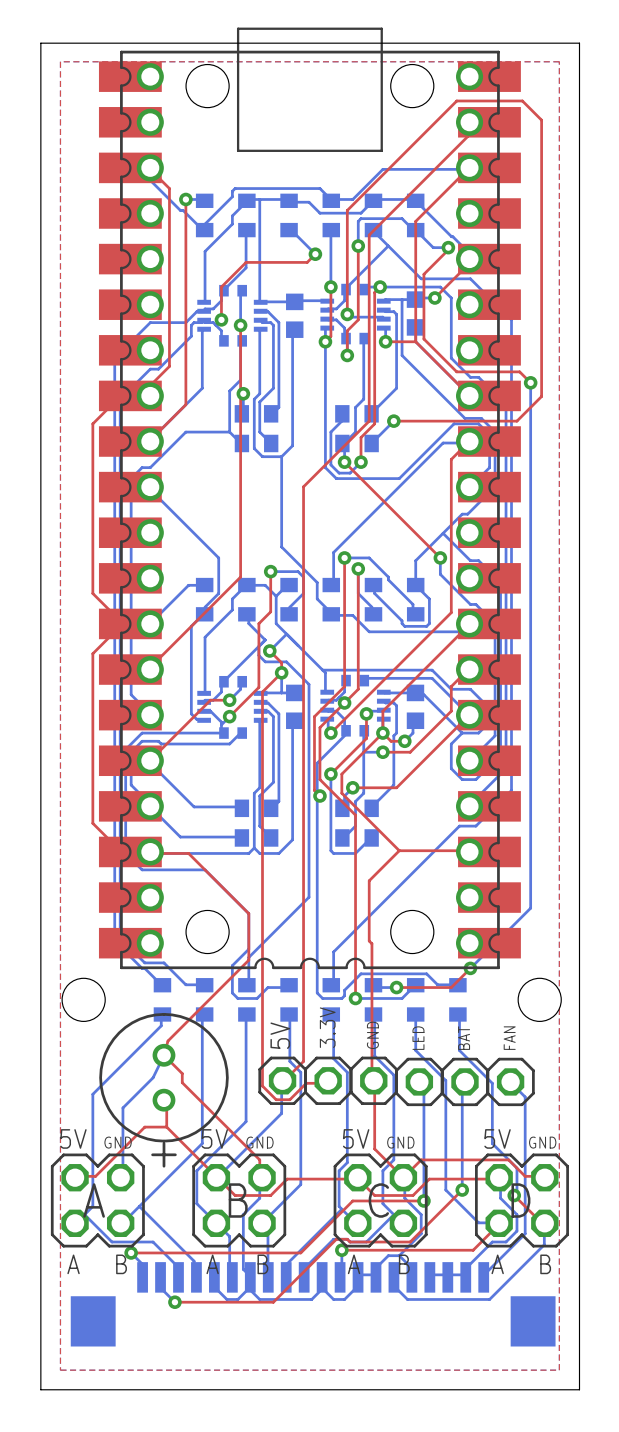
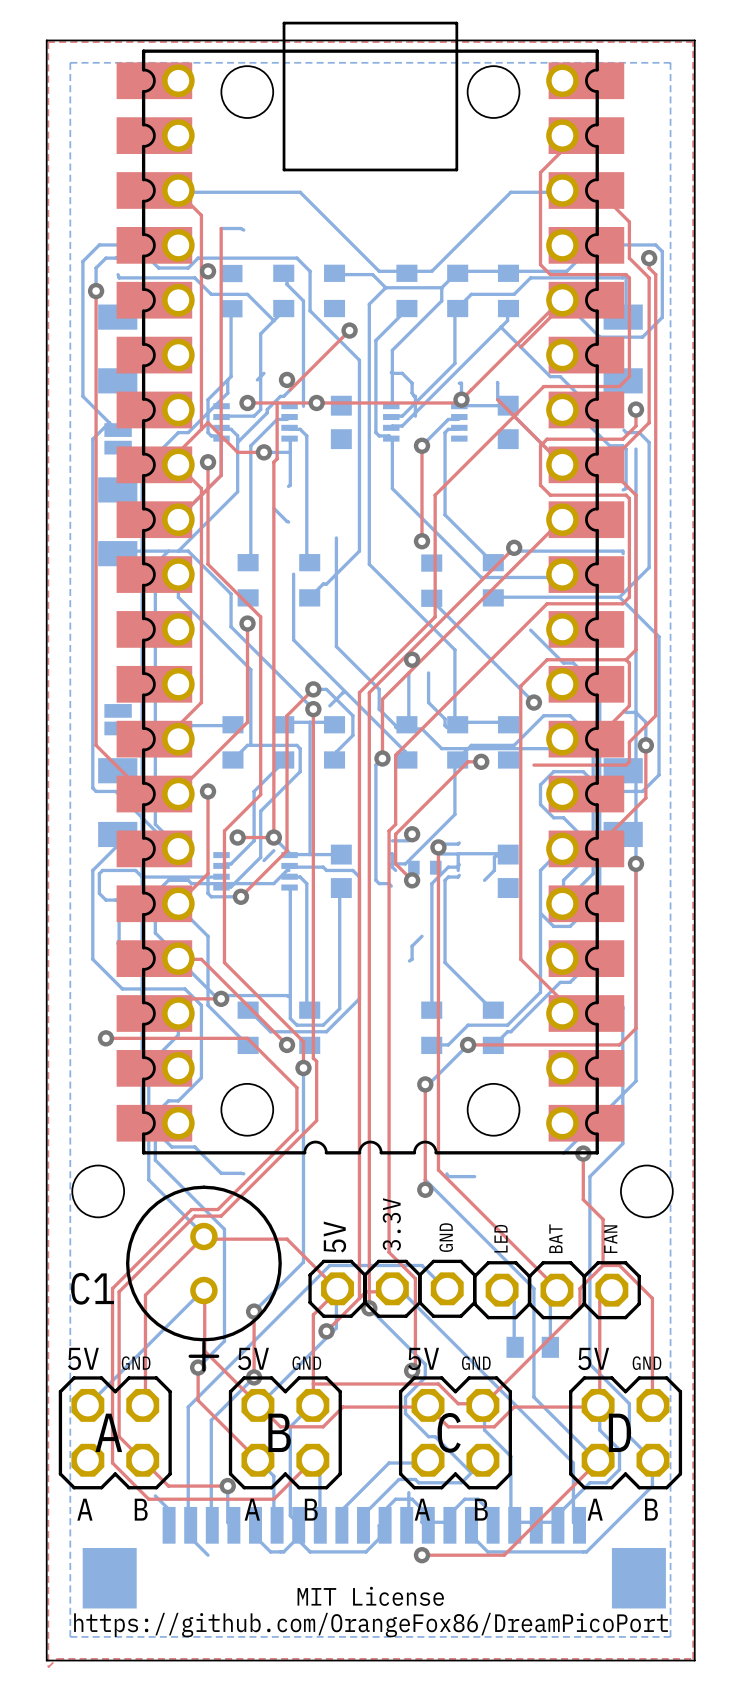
top zone outline: (60, 61) (559, 61) (559, 1370) (60, 1370) (60, 61) -> (48, 42) (48, 1667) (57, 1658) (693, 1658) (693, 42) (48, 42)
top track: (451, 152) (369, 235) (369, 421) (303, 486) (303, 1061) (282, 1080) -> (540, 172) (540, 264) (550, 274) (626, 274) (629, 277) (629, 376) (619, 386) (543, 386) (435, 495) (435, 616) (359, 692) (359, 1298)
top track: (469, 167) (415, 221) (415, 341) (385, 341) -> none
bottom track: (150, 169) (150, 180) (180, 210) (183, 210) (204, 230) (205, 224) (232, 196) (232, 191) (235, 188) (319, 188) (331, 200) (352, 199) (382, 169) (426, 169) -> (178, 192) (300, 192) (379, 271) (405, 271) (406, 273) (408, 271) (431, 271) (510, 192)
via position: (185, 199) -> (208, 271)
bottom track: (259, 199) (259, 235) -> (118, 430) (82, 396) (82, 261) (99, 244) (135, 244) (158, 268) (188, 268) (198, 258) (296, 258) (310, 271)
part: (204, 215) -> none
part: (246, 215) -> none
part: (289, 215) -> none
part: (331, 215) -> none
part: (373, 215) -> none
part: (415, 215) -> none
bottom track: none -> (118, 257) (105, 258) (96, 268) (96, 291)
top track: (541, 224) (541, 120) (522, 100) (456, 100) (347, 210) (347, 314) -> none
via: none -> (649, 258)
bottom track: (246, 230) (246, 267) (221, 292) (221, 300) (213, 308) (196, 311) (185, 322) (150, 322) (114, 358) (114, 941) (162, 985) -> none
bottom track: (289, 230) (315, 254) -> none
bottom track: (331, 230) (330, 287) -> none
bottom track: (373, 230) (421, 278) (470, 278) (511, 319) (511, 790) (497, 804) -> none
top track: (541, 232) (541, 240) -> (586, 190) (586, 192) (599, 192) (629, 221) (629, 258) (649, 277)
top track: none -> (649, 268) (655, 274) (655, 715) (629, 742) (629, 761) (626, 765) (533, 765)
bottom track: none -> (283, 273) (287, 274) (287, 284) (303, 300) (303, 406)
bottom track: none -> (334, 273) (372, 274) (385, 287)
bottom track: none -> (118, 274) (119, 277) (194, 277) (211, 294) (247, 294) (273, 320)
top track: (358, 246) (358, 319) (347, 330) (347, 355) -> none
bottom track: (358, 246) (358, 221) (361, 218) (402, 218) (433, 247) (448, 247) -> none
via: (358, 246) -> none
bottom track: (388, 246) (344, 289) (344, 300) (336, 308) (327, 310) -> none
top track: (448, 247) (423, 274) (423, 339) (456, 371) (519, 371) (530, 382) -> none
via: (448, 247) -> none
bottom track: none -> (385, 287) (441, 287)
bottom track: none -> (385, 287) (369, 304) (369, 564) (454, 649) (454, 722) (457, 724) (458, 722) (507, 722) (508, 724)
bottom track: none -> (441, 287) (441, 300) (392, 350) (391, 406)
top track: none -> (96, 291) (96, 745) (142, 791) (152, 791) (154, 794)
via: none -> (96, 291)
part: none -> (231, 291)
part: none -> (283, 290)
part: none -> (334, 290)
part: none -> (406, 290)
part: none -> (457, 290)
part: none -> (508, 290)
top track: (315, 254) (307, 262) (246, 262) (221, 287) (221, 319) -> none
via: (315, 254) -> none
top track: none -> (562, 300) (586, 300) (560, 300) (458, 402) (247, 402)
bottom track: (469, 259) (469, 253) (412, 199) (374, 199) (361, 213) (319, 213) (309, 202) (289, 202) (287, 199) (248, 199) (232, 215) (232, 224) (205, 251) (204, 302) -> (562, 300) (599, 337) (642, 337) (662, 317) (662, 251) (655, 244) (593, 244) (566, 271) (510, 271) (508, 273) (507, 271) (458, 271) (441, 287)
bottom track: none -> (283, 308) (283, 310) (260, 333) (260, 409) (254, 416) (221, 417)
bottom track: none -> (508, 308) (507, 320) (402, 426) (392, 426) (391, 427)
bottom track: (259, 267) (260, 302) (327, 301) -> (310, 310) (359, 360) (359, 551) (309, 597)
bottom track: none -> (623, 317) (626, 314) (626, 277) (623, 274) (622, 277) (530, 277) (514, 294) (471, 294) (454, 310) (454, 363) (402, 416) (391, 417)
bottom track: none -> (501, 327) (550, 376) (560, 376) (586, 402) (586, 422) (609, 445) (622, 445) (626, 449) (626, 488) (623, 489)
top track: none -> (349, 330) (290, 389)
via: none -> (349, 330)
top track: (330, 287) (330, 336) (325, 341) -> none
via: (330, 287) -> none
top track: (380, 287) (374, 292) (374, 423) (361, 437) (361, 462) -> none
via: (380, 287) -> none
part: (355, 289) -> none
bottom track: (364, 289) (366, 287) (440, 287) (451, 297) (451, 358) (470, 377) (478, 377) (506, 404) (506, 768) (469, 806) -> none
part: (233, 290) -> none
bottom track: (242, 290) (240, 325) -> none
bottom track: (434, 297) (383, 301) -> none
via: (434, 297) -> none
part: none -> (117, 348)
bottom track: (402, 299) (402, 355) (464, 418) (481, 418) (495, 432) (495, 486) (467, 514) (462, 514) (415, 560) (415, 585) -> none
part: none -> (623, 348)
bottom track: (383, 310) (393, 311) (396, 314) (396, 388) (371, 413) -> none
bottom track: (260, 311) (267, 311) (278, 322) (278, 407) (271, 413) -> none
part position: (415, 313) -> (508, 422)
bottom track: (347, 314) (350, 317) (382, 317) (383, 319) -> none
via: (347, 314) -> none
part position: (355, 314) -> (425, 422)
part position: (232, 315) -> (255, 422)
part position: (294, 315) -> (341, 422)
via: (221, 319) -> none
bottom track: (260, 320) (262, 322) (270, 322) (273, 325) (273, 388) (259, 401) (259, 432) (271, 443) -> none
bottom track: (194, 322) (202, 322) (204, 320) (205, 322) (213, 322) (221, 330) (221, 339) (223, 340) -> (231, 376) (231, 308)
top track: (240, 325) (240, 577) (207, 609) -> (247, 623) (247, 722)
bottom track: (327, 328) (325, 328) (325, 467) (336, 478) (399, 478) (454, 423) (478, 423) (489, 434) (489, 467) (469, 487) -> (406, 308) (375, 340) (375, 432) (379, 435) (389, 435) (392, 439) (392, 488) (481, 577) (560, 577) (562, 574)
bottom track: (204, 329) (202, 330) (202, 388) (185, 404) -> (227, 379) (208, 399) (208, 432) (211, 435) (221, 435) (221, 475)
bottom track: (260, 329) (259, 393) (254, 399) (254, 448) (262, 456) (281, 456) (292, 445) (292, 330) (294, 329) -> none
bottom track: none -> (290, 389) (283, 396) (280, 396) (267, 409) (267, 412) (237, 442)
part: (355, 338) -> none
bottom track: (364, 338) (363, 399) (355, 407) (355, 432) (342, 443) (344, 445) (344, 462) -> none
part: (233, 340) -> none
bottom track: (242, 340) (240, 341) (240, 380) (229, 391) (229, 432) (185, 432) -> (221, 427) (231, 429) (237, 435) (237, 491) (221, 508)
via: (325, 341) -> none
via: none -> (247, 402)
top track: none -> (277, 402) (277, 458) (273, 462) (273, 837) (237, 837)
via: none -> (316, 402)
bottom track: none -> (508, 405) (459, 406)
via: (347, 355) -> none
bottom track: none -> (289, 417) (287, 419) (277, 419) (250, 445) (250, 561) (248, 562)
bottom track: none -> (459, 417) (458, 419) (448, 419) (421, 445)
bottom track: none -> (109, 422) (92, 439) (92, 788) (96, 791) (115, 791) (171, 847) (178, 847)
top track: (541, 360) (541, 396) (516, 421) -> (649, 422) (606, 465)
bottom track: none -> (289, 427) (300, 429) (306, 435) (306, 561) (309, 562)
bottom track: none -> (459, 427) (448, 429) (445, 432) (445, 514) (493, 562)
top track: none -> (201, 429) (208, 422) (237, 452) (263, 452)
bottom track: none -> (623, 430) (626, 432) (639, 432) (649, 442) (649, 567) (619, 597)
part: none -> (118, 438)
bottom track: none -> (289, 438) (290, 462)
top track: none -> (421, 445) (421, 541)
via: none -> (421, 445)
via position: (530, 382) -> (635, 409)
bottom track: none -> (263, 452) (290, 452)
top track: none -> (208, 462) (208, 564) (260, 616) (260, 794) (224, 830) (224, 962) (303, 1041) (303, 1067)
via: none -> (208, 462)
via position: (243, 393) -> (263, 452)
top track: (130, 395) (120, 396) (92, 423) (92, 593) (120, 620) (120, 626) -> none
top track: none -> (178, 465) (201, 488) (201, 702) (178, 725) (178, 738)
top track: none -> (606, 465) (635, 495) (635, 649) (626, 659)
part: (256, 413) -> none
bottom track: (342, 413) (341, 421) (330, 432) (330, 464) (339, 473) (350, 473) (361, 462) -> none
part: (356, 413) -> none
top track: (393, 421) (459, 421) -> (635, 409) (635, 426) (622, 439) (547, 439) (540, 445) (540, 485) (550, 495)
bottom track: (393, 421) (371, 443) -> none
via: (393, 421) -> none
top track: none -> (619, 495) (626, 495) (629, 498) (629, 597) (622, 603) (547, 603) (395, 755) (395, 824) (389, 830) (389, 1252) (415, 1278) (415, 1367) (412, 1370)
bottom track: (469, 441) (443, 443) (333, 552) (333, 582) (331, 585) -> none
part: none -> (117, 521)
part: (256, 443) -> none
part: (357, 443) -> none
via: none -> (421, 541)
top track: (451, 459) (451, 612) (330, 733) -> (540, 541) (382, 699) (382, 758)
top track: (344, 462) (440, 557) -> none
via: (344, 462) -> none
via: (361, 462) -> none
top track: none -> (514, 547) (369, 692) (369, 1308)
bottom track: none -> (514, 547) (517, 551) (622, 551) (623, 553)
via: none -> (514, 547)
bottom track: none -> (168, 551) (119, 551) (117, 553)
bottom track: none -> (178, 551) (188, 551) (231, 593) (231, 626) (313, 709)
bottom track: none -> (293, 574) (293, 640) (405, 751) (406, 759)
bottom track: (150, 489) (218, 557) (218, 593) (205, 607) (204, 614) (191, 626) (191, 713) (196, 719) (204, 720) -> (178, 577) (178, 597) (250, 669) (250, 745)
part: none -> (248, 580)
part: none -> (309, 580)
part: none -> (493, 580)
part: none -> (431, 580)
bottom track: none -> (619, 597) (493, 597)
bottom track: none -> (431, 598) (533, 702)
via: none -> (247, 623)
top track: (344, 557) (344, 686) (314, 716) (314, 790) (319, 796) -> none
bottom track: (344, 557) (369, 557) (412, 604) (412, 612) (415, 614) -> none
bottom track: (440, 557) (440, 574) (470, 604) -> (391, 864) (405, 863) (454, 814) (454, 761) (471, 745) (514, 745) (543, 715) (563, 715)
via position: (440, 557) -> (533, 702)
top track: none -> (626, 659) (629, 663) (629, 705) (596, 738) (586, 738)
bottom track: none -> (408, 672) (408, 722) (406, 724)
top track: (358, 568) (358, 689) (319, 727) (319, 779) (355, 815) (355, 910) -> none
via: (358, 568) -> none
top track: (270, 571) (270, 611) (258, 623) (258, 687) (229, 716) -> none
bottom track: (270, 571) (298, 571) (303, 577) (303, 593) (289, 607) (289, 614) -> none
via position: (270, 571) -> (313, 689)
top track: none -> (313, 689) (287, 715) (287, 850) (240, 896)
bottom track: none -> (313, 689) (326, 689) (352, 715) (352, 735) (336, 751) (334, 759)
bottom track: (204, 585) (188, 585) (161, 612) -> (232, 724) (191, 725)
bottom track: (373, 585) (374, 593) (402, 620) (404, 626) (426, 626) (429, 623) (429, 598) (415, 585) -> none
via: none -> (313, 709)
part: (204, 599) -> none
part: (246, 599) -> none
part: (289, 599) -> none
part: (331, 599) -> none
part: (373, 599) -> none
part: (415, 599) -> none
bottom track: none -> (623, 710) (635, 712) (645, 722) (645, 745)
part: none -> (118, 719)
bottom track: none -> (310, 722) (310, 854)
bottom track: none -> (283, 724) (287, 722) (333, 722) (334, 724)
bottom track: (246, 614) (248, 615) (248, 623) (265, 640) (221, 683) (221, 692) (213, 700) (205, 700) (204, 702) -> none
top track: (120, 626) (92, 653) (92, 823) (120, 850) (130, 851) -> none
part: none -> (232, 742)
part: none -> (283, 742)
part: none -> (334, 742)
part: none -> (406, 742)
part: none -> (457, 742)
part: none -> (508, 742)
top track: (467, 626) (382, 711) (382, 733) -> none
top track: none -> (645, 745) (645, 798) (596, 847) (586, 848)
via: none -> (645, 745)
bottom track: (286, 634) (269, 650) -> none
bottom track: none -> (382, 758) (375, 765) (375, 880) (379, 883) (389, 883) (391, 886)
via: none -> (382, 758)
bottom track: none -> (232, 759) (247, 745) (296, 745) (300, 748) (300, 771) (260, 811) (260, 857) (231, 886) (221, 887)
bottom track: none -> (283, 759) (254, 791) (254, 840) (231, 863) (221, 865)
top track: none -> (481, 761) (468, 761) (395, 834) (395, 863) (412, 880)
via: none -> (481, 761)
bottom track: (258, 646) (258, 655) (265, 661) (286, 661) (309, 684) (309, 897) (248, 957) (248, 984) (246, 985) -> none
top track: (269, 650) (281, 662) (281, 672) (262, 692) -> (313, 709) (313, 821)
via: (269, 650) -> none
via: none -> (208, 791)
top track: (469, 669) (451, 686) (451, 711) (410, 752) (382, 752) -> none
bottom track: (322, 670) (432, 670) (451, 689) (462, 689) -> (619, 597) (659, 636) (659, 774) (642, 791) (603, 791) (583, 771) (553, 771) (540, 784) (540, 804) (553, 817)
bottom track: (281, 672) (281, 692) -> none
via: (281, 672) -> none
part: none -> (117, 802)
part: none -> (623, 802)
bottom track: (346, 680) (344, 692) (336, 700) (327, 701) -> none
part: (355, 680) -> none
bottom track: (364, 680) (366, 678) (432, 678) (469, 715) -> none
part: (233, 681) -> none
bottom track: (242, 681) (240, 689) (229, 700) -> none
bottom track: (294, 692) (260, 693) -> none
bottom track: (327, 692) (325, 692) (325, 672) (276, 623) (276, 596) (265, 585) (246, 585) (232, 598) (232, 609) (205, 637) (204, 693) -> none
bottom track: (383, 692) (423, 694) (462, 733) -> none
top track: (229, 700) (210, 700) (174, 735) -> (208, 791) (208, 873)
via: (229, 700) -> none
bottom track: (383, 701) (393, 702) (396, 705) (396, 733) (393, 735) (393, 785) (371, 808) -> none
bottom track: (260, 702) (267, 702) (278, 713) (278, 801) (271, 808) -> none
bottom track: none -> (117, 834) (115, 847) (92, 870) (92, 959) (122, 988) (184, 988) (201, 1005) (201, 1077) (178, 1100) (168, 1100) (155, 1114) (155, 1160) (224, 1229) (224, 1341) (198, 1367)
via: none -> (237, 837)
bottom track: none -> (273, 837) (289, 855) (341, 854)
via: none -> (273, 837)
part: (355, 705) -> none
part position: (232, 706) -> (255, 871)
part position: (294, 706) -> (341, 871)
part position: (415, 706) -> (508, 871)
bottom track: none -> (392, 840) (408, 840)
bottom track: (327, 710) (336, 711) (344, 719) (344, 730) (347, 733) (317, 763) (317, 993) (322, 998) (341, 998) (344, 995) (344, 990) (361, 973) (426, 973) (437, 984) (457, 985) -> none
bottom track: (204, 711) (210, 711) (221, 722) (221, 733) -> none
bottom track: (260, 711) (267, 711) (273, 716) (273, 782) (259, 796) (259, 826) (271, 837) -> none
top track: (469, 715) (396, 787) (352, 787) -> none
via: (229, 716) -> none
bottom track: none -> (438, 853) (508, 854)
bottom track: (260, 720) (259, 787) (254, 793) (254, 847) -> none
bottom track: (294, 720) (292, 722) (292, 839) (284, 847) -> (341, 888) (339, 890) (339, 1008)
top track: none -> (635, 863) (635, 1028) (619, 1044) (468, 1044)
via: none -> (635, 863)
bottom track: none -> (459, 864) (458, 867) (448, 867) (431, 883) (431, 1010)
bottom track: none -> (289, 865) (323, 867) (326, 870) (352, 870) (359, 877) (359, 998) (326, 1031) (270, 1031) (248, 1010)
bottom track: (364, 730) (363, 793) (355, 801) (355, 826) (342, 837) -> none
bottom track: (223, 733) (142, 733) (125, 749) (125, 853) (142, 869) (205, 869) (248, 913) (248, 949) (232, 965) (232, 993) (237, 998) (257, 998) (267, 987) (287, 987) (289, 985) -> none
part: (233, 733) -> none
via position: (330, 733) -> (412, 880)
top track: (382, 733) (391, 741) (404, 741) -> none
top track: (382, 733) (341, 774) (341, 793) (399, 850) -> none
via: (382, 733) -> none
bottom track: (462, 733) (451, 744) -> (562, 848) (540, 870) (540, 883)
bottom track: (462, 733) (478, 733) -> (563, 903) (563, 880) (573, 870)
bottom track: none -> (459, 875) (458, 877) (448, 877) (445, 880) (445, 962) (493, 1010)
bottom track: none -> (208, 877) (208, 893) (211, 896) (240, 896)
bottom track: none -> (221, 876) (142, 877) (135, 870) (102, 870) (99, 873) (99, 893) (105, 900) (115, 900) (119, 903) (117, 943)
bottom track: none -> (289, 876) (300, 877) (306, 883) (306, 1008) (309, 1010)
top track: (366, 738) (330, 774) -> (438, 877) (438, 1170) (556, 1288)
via: (404, 741) -> none
bottom track: (363, 752) (382, 752) -> none
via: (382, 752) -> none
via: none -> (240, 896)
bottom track: none -> (540, 913) (540, 992)
bottom track: (330, 774) (330, 850) (333, 853) (355, 853) (371, 837) -> none
via: (330, 774) -> none
bottom track: (174, 787) (194, 806) (241, 808) -> (208, 936) (208, 1005) (248, 1045)
via: (352, 787) -> none
via: (319, 796) -> none
top track: none -> (178, 959) (201, 959) (287, 1044)
part: (256, 808) -> none
part: (357, 808) -> none
bottom track: (467, 826) (459, 826) (451, 834) -> (560, 982) (510, 1031) (507, 1031) (493, 1045)
part rotation: 0° (256, 837) -> 90° clockwise (309, 1027)
part rotation: 0° (357, 837) -> 90° clockwise (431, 1027)
top track: none -> (221, 998) (191, 998) (178, 1012)
via: none -> (221, 998)
bottom track: (254, 847) (259, 853) (278, 853) -> (289, 887) (290, 1018) (296, 1025) (323, 1025) (333, 1015)
bottom track: (254, 847) (248, 853) (150, 853) -> (203, 1236) (148, 1179) (148, 1064) (178, 1035) (178, 1015)
top track: (399, 850) (467, 850) -> (626, 659) (547, 659) (520, 686) (520, 959) (560, 998) (560, 1012)
top track: (399, 850) (369, 880) (369, 941) (371, 943) (371, 1080) (374, 1083) (374, 1148) (402, 1176) -> (313, 1384) (438, 1384) (458, 1403) (481, 1403)
top track: (150, 851) (188, 853) (207, 872) -> (105, 1038) (247, 1038)
bottom track: (423, 861) (333, 951) (333, 984) (331, 985) -> (507, 1025) (468, 1025) (448, 1044) (431, 1045)
part: none -> (248, 1027)
part: none -> (493, 1027)
via: none -> (105, 1038)
via: none -> (287, 1044)
bottom track: none -> (468, 1044) (428, 1084) (425, 1084)
via: none -> (468, 1044)
top track: (262, 889) (262, 1086) (276, 1099) (289, 1099) -> (313, 1058) (316, 1061) (316, 1120) (221, 1216) (194, 1216) (119, 1291) (119, 1436) (168, 1486) (227, 1486)
bottom track: none -> (303, 1067) (303, 1262) (254, 1311)
via: none -> (303, 1067)
via: none -> (425, 1084)
top track: (248, 949) (248, 960) (169, 1039) -> (296, 1130) (217, 1209) (191, 1209) (112, 1288) (112, 1463) (148, 1499) (273, 1499) (312, 1460)
top track: (470, 968) (451, 987) (396, 987) -> none
via position: (470, 968) -> (583, 1153)
top track: none -> (583, 1153) (583, 1199) (603, 1219) (603, 1265)
bottom track: (415, 985) (402, 998) (355, 998) -> none
via: (396, 987) -> none
part: (162, 999) -> none
part: (204, 999) -> none
part: (246, 999) -> none
part: (289, 999) -> none
part: (331, 999) -> none
part: (373, 999) -> none
part: (415, 999) -> none
part: (457, 999) -> none
bottom track: (162, 1014) (161, 1025) (92, 1094) (92, 1206) (75, 1223) (84, 1214) (112, 1242) (153, 1242) (177, 1266) -> none
bottom track: (204, 1014) (202, 1014) (202, 1143) (120, 1223) -> none
bottom track: (246, 1014) (246, 1121) (213, 1154) -> none
bottom track: (289, 1014) (289, 1061) (300, 1072) (300, 1184) (262, 1223) -> none
bottom track: (331, 1014) (333, 1014) (333, 1058) (347, 1072) (347, 1162) -> (369, 1308) (425, 1364) (425, 1377) (415, 1387)
bottom track: (373, 1014) (374, 1055) (393, 1075) (393, 1159) (382, 1170) (382, 1203) (403, 1223) (393, 1214) (366, 1242) -> (482, 1460) (461, 1482) (438, 1482)
bottom track: (415, 1014) (415, 1050) -> (425, 1179) (497, 1252)
bottom track: (457, 1014) (459, 1014) (459, 1050) (492, 1083) -> (623, 1007) (622, 1143) (589, 1176) (589, 1291)
top track: (167, 1041) (163, 1055) (182, 1073) (182, 1082) (259, 1159) (259, 1176) (262, 1177) -> (201, 1239) (203, 1236) (204, 1239) (287, 1239) (337, 1288) (313, 1314) (312, 1405)
top track: none -> (199, 1240) (145, 1295) (145, 1403) (142, 1405)
bottom track: (163, 1055) (153, 1077) (122, 1107) (122, 1176) (120, 1177) -> none
top track: none -> (603, 1265) (619, 1265) (652, 1298) (652, 1403)
text: none -> C1 (92, 1288)
bottom track: none -> (392, 1288) (392, 1291) (402, 1291) (573, 1463) (573, 1522) (575, 1525)
bottom track: none -> (447, 1288) (421, 1265) (329, 1265) (188, 1407) (187, 1525)
top track: none -> (611, 1288) (599, 1301) (599, 1403) (598, 1405)
bottom track: (510, 1081) (525, 1096) (525, 1176) -> none
bottom track: none -> (203, 1290) (87, 1405)
bottom track: (423, 1086) (423, 1200) -> (507, 1295) (514, 1301) (515, 1347)
bottom track: (462, 1086) (462, 1190) -> (553, 1295) (550, 1298) (550, 1347)
part position: (163, 1090) -> (203, 1278)
via: none -> (369, 1308)
top track: none -> (254, 1311) (254, 1377)
via: none -> (254, 1311)
top track: none -> (346, 1311) (326, 1331)
top track: (163, 1100) (166, 1100) (166, 1127) -> none
via: none -> (326, 1331)
top track: (166, 1127) (172, 1132) -> (203, 1290) (204, 1351)
top track: (166, 1127) (144, 1127) (95, 1176) (75, 1177) -> none
part: none -> (532, 1347)
top track: none -> (198, 1367) (198, 1400) (257, 1460)
via: none -> (198, 1367)
via: none -> (412, 1370)
via: none -> (254, 1377)
top track: (421, 1159) (508, 1159) (525, 1176) (544, 1176) -> (504, 1384) (580, 1308) (580, 1288) (603, 1265)
bottom track: (516, 1168) (516, 1192) (514, 1195) -> (619, 1393) (629, 1403)
bottom track: (196, 1170) (196, 1203) (216, 1223) -> (234, 1397) (211, 1420) (211, 1512)
bottom track: (445, 1170) (445, 1190) (478, 1222) (497, 1222) -> (533, 1397) (596, 1459)
bottom track: (259, 1179) (259, 1198) (243, 1214) -> (310, 1407) (290, 1426) (290, 1449)
bottom track: (339, 1184) (339, 1206) (357, 1223) -> (405, 1413) (428, 1436) (435, 1436) (471, 1472)
top track: (462, 1190) (410, 1242) (350, 1242) (347, 1239) (336, 1239) (273, 1302) (174, 1302) -> none
via: (462, 1190) -> none
top track: (514, 1195) (544, 1225) (544, 1223) -> none
via: (514, 1195) -> none
top track: (423, 1200) (352, 1200) (300, 1252) (131, 1252) -> none
via: (423, 1200) -> none
bottom track: (525, 1203) (525, 1233) (483, 1277) -> (629, 1436) (652, 1460)
bottom track: (139, 1206) (194, 1261) (194, 1274) (196, 1277) -> none
bottom track: (341, 1209) (325, 1225) -> (428, 1460) (425, 1463) (389, 1463)
bottom track: (421, 1214) (421, 1233) (399, 1255) -> (504, 1449) (510, 1456) (511, 1525) (517, 1522)
bottom track: none -> (227, 1486) (227, 1522) (230, 1525)
via: none -> (227, 1486)
top track: (341, 1250) (473, 1250) -> (421, 1555) (504, 1555) (566, 1492)
via: (341, 1250) -> none
via: (131, 1252) -> none
bottom track: (358, 1274) (358, 1277) (355, 1277) (355, 1288) (344, 1299) (333, 1299) (322, 1288) -> (428, 1522) (425, 1522) (424, 1525) (421, 1522) (421, 1509) (412, 1499) (395, 1499) (382, 1512) (382, 1522) (379, 1525) (379, 1538) (366, 1551)
bottom track: (322, 1288) (311, 1299) (306, 1299) -> none
via: (174, 1302) -> none
via: none -> (421, 1555)
text: none -> MIT License (370, 1596)
text: none -> https://github.com/OrangeFox86/DreamPicoPort (370, 1625)

